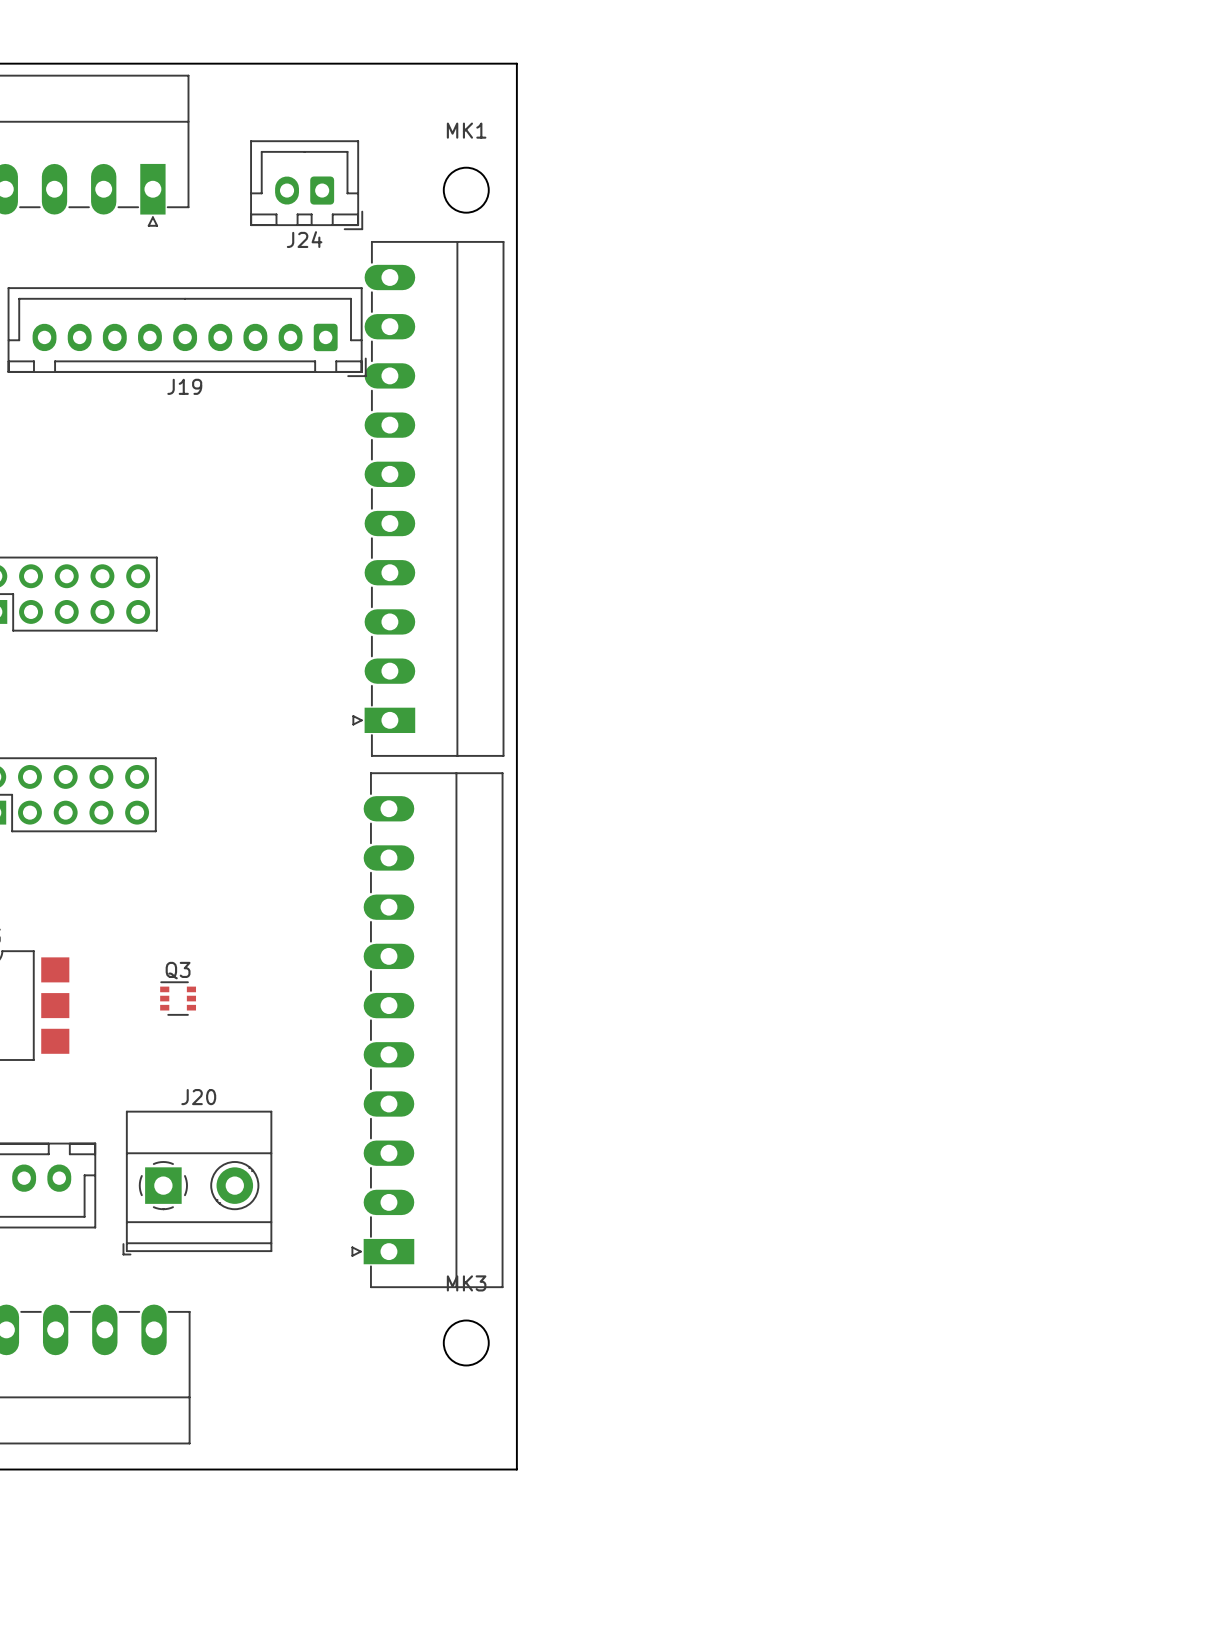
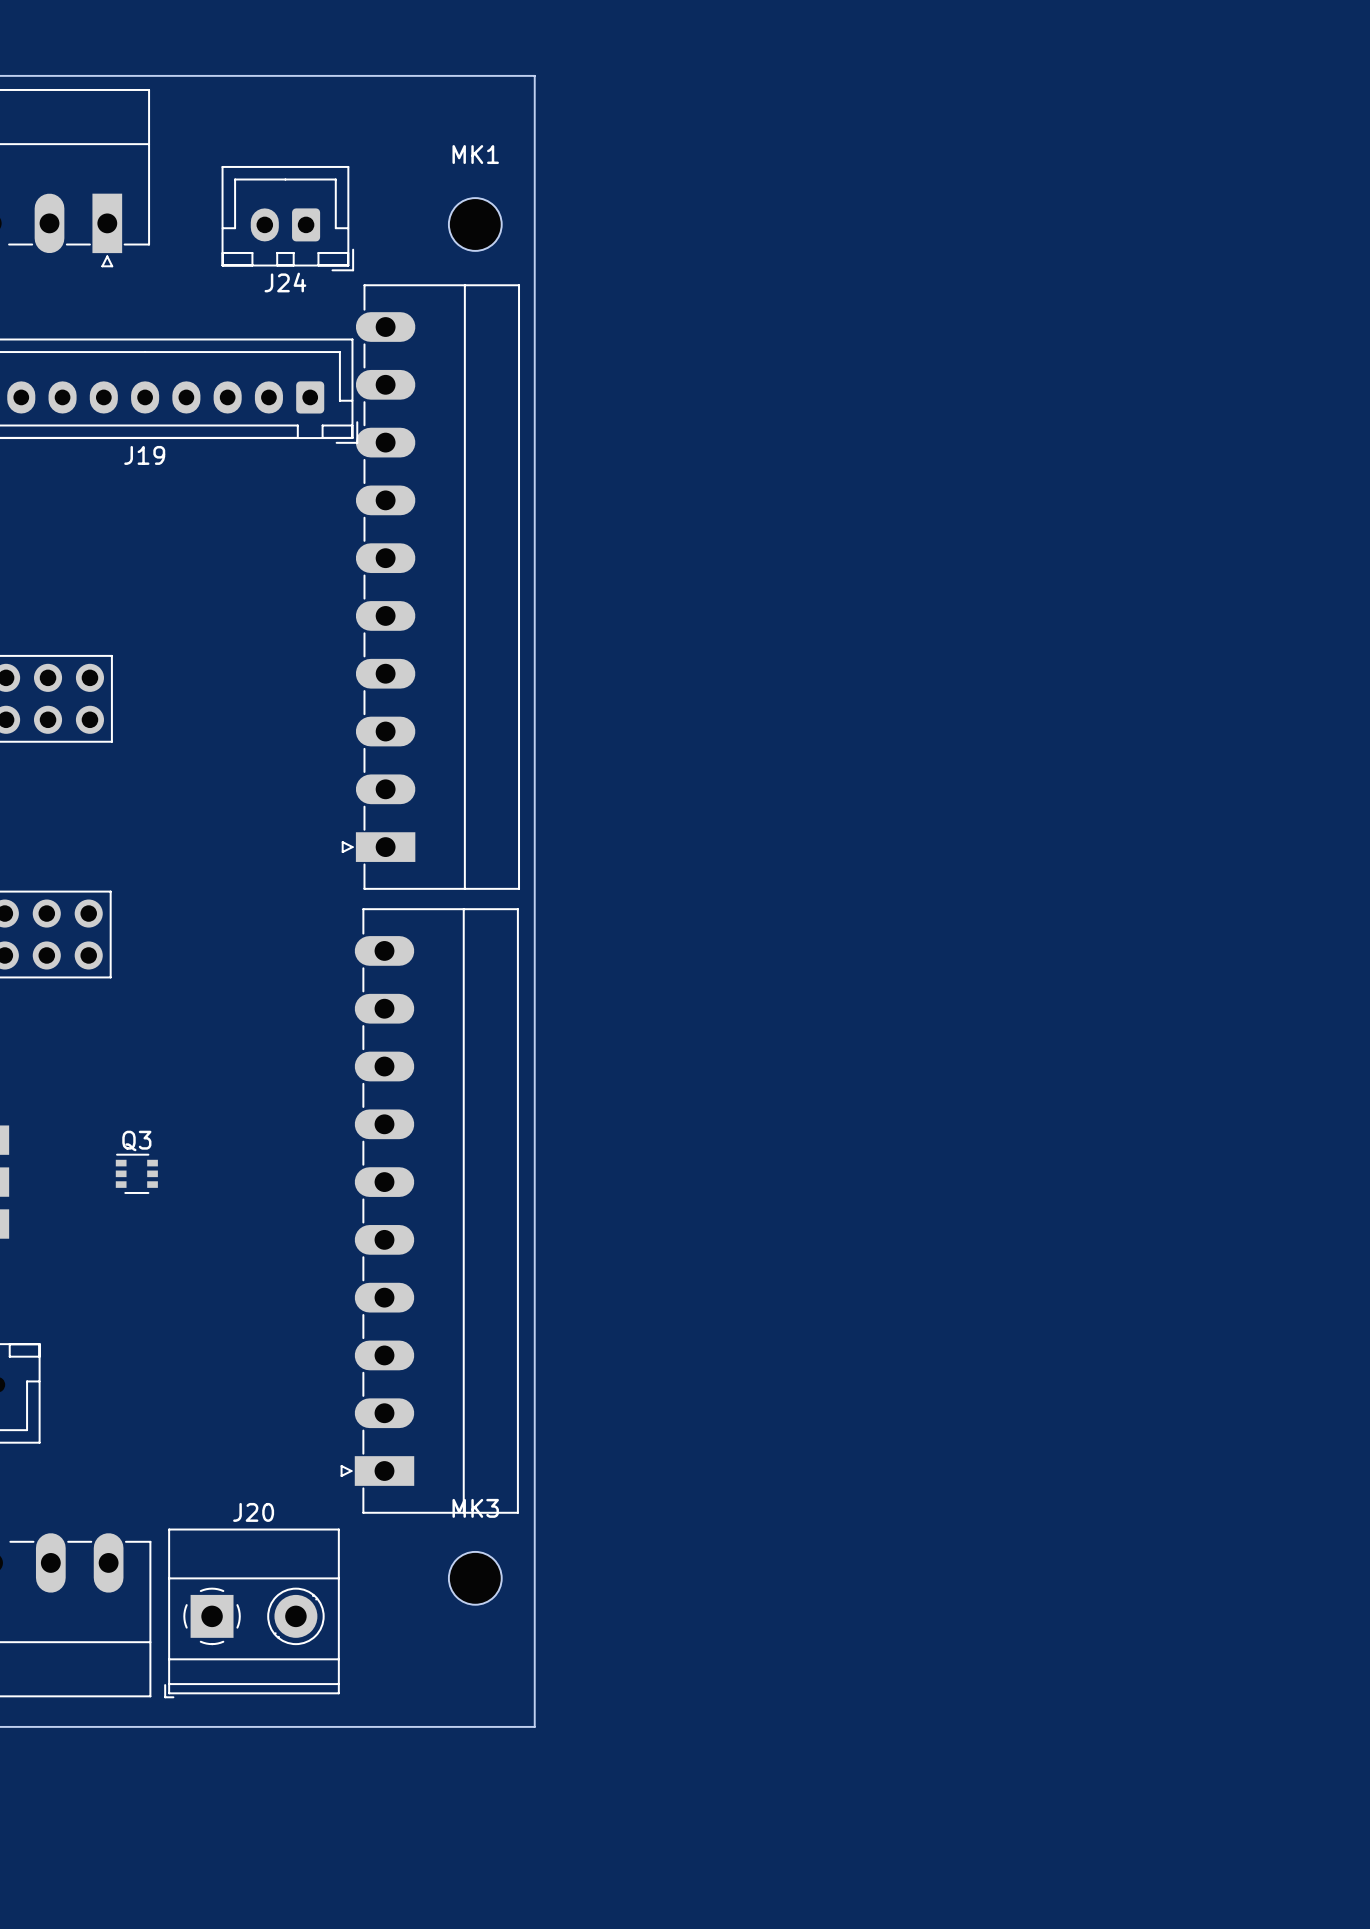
J20 position: (197, 1183) -> (252, 1613)

